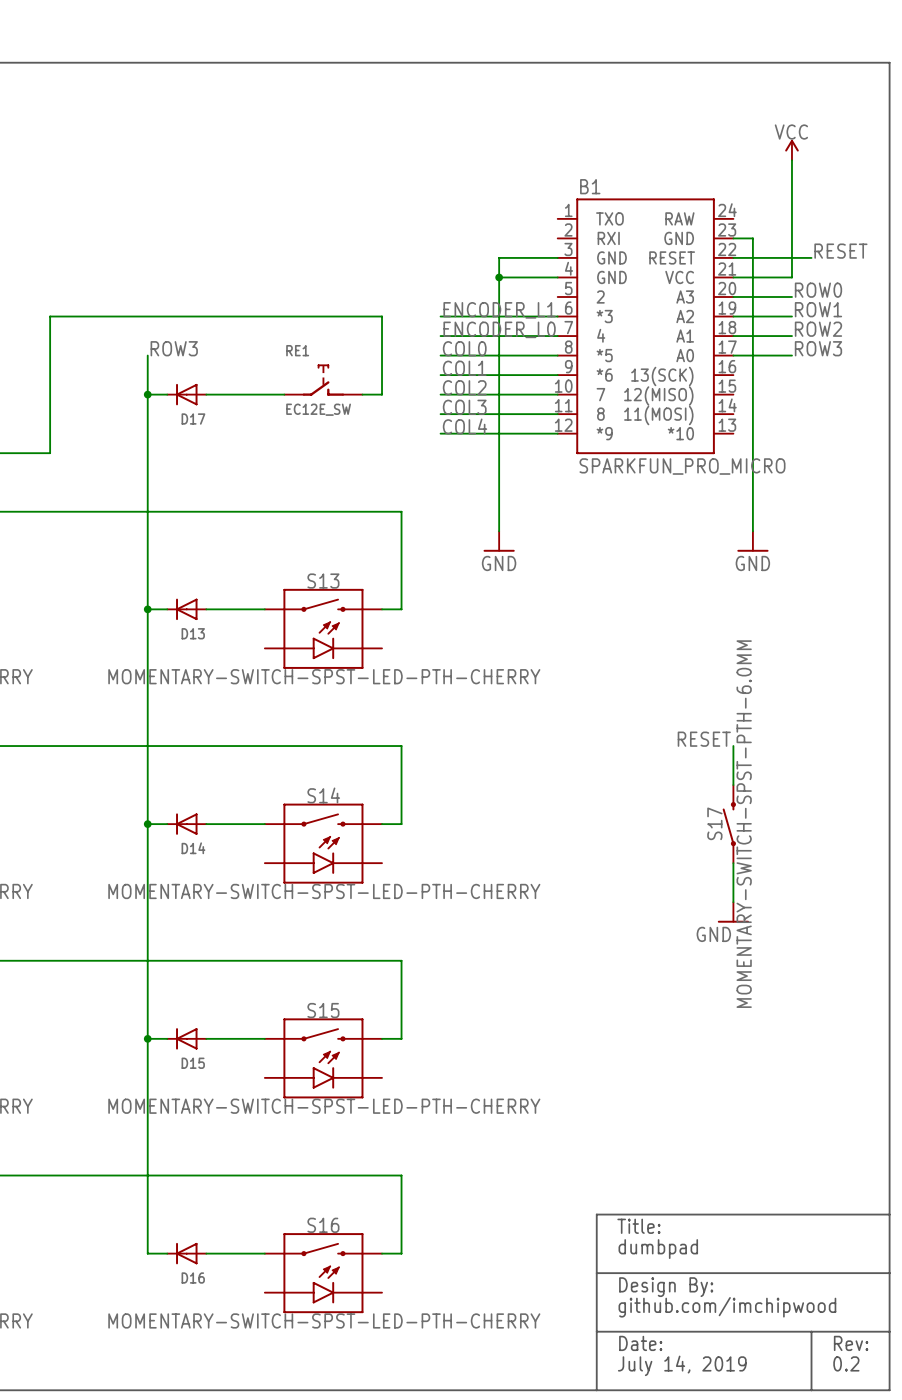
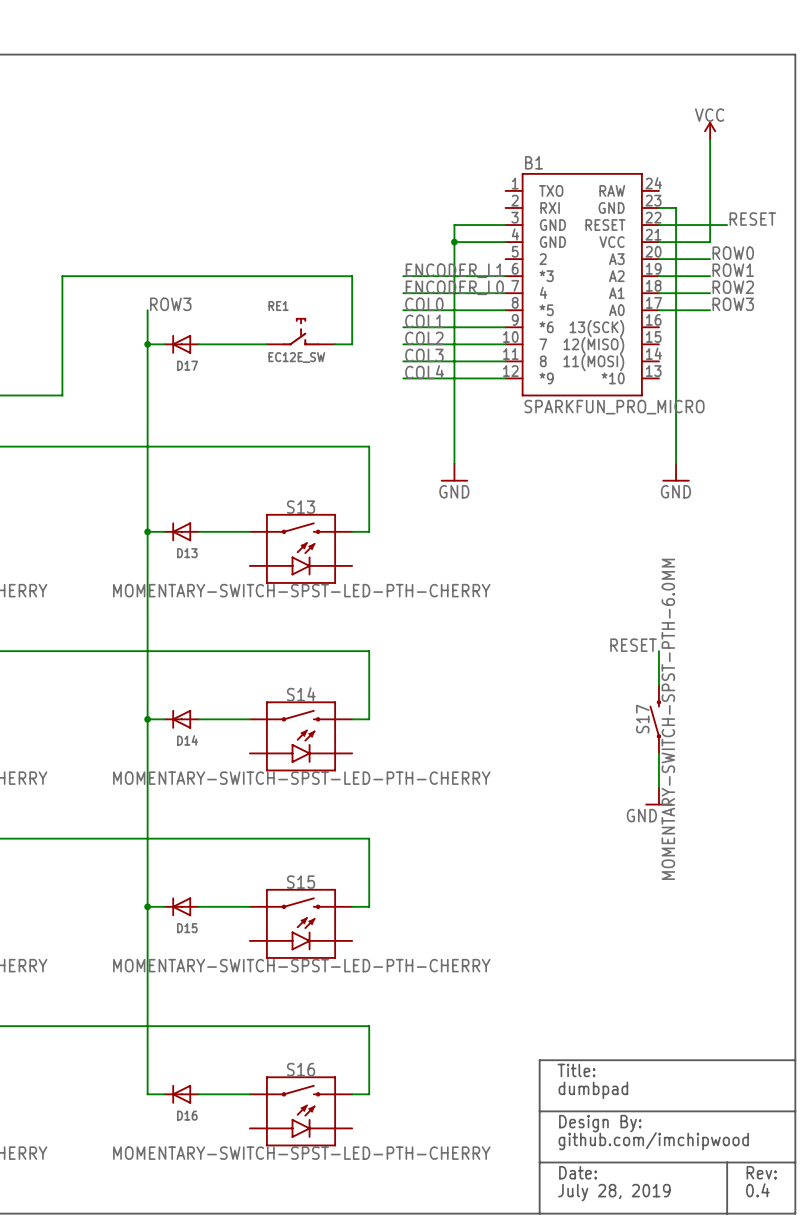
text: 0.2 (846, 1363) -> 0.4 (757, 1190)
text: July 14, 2019 (682, 1365) -> July 28, 2019 (614, 1192)

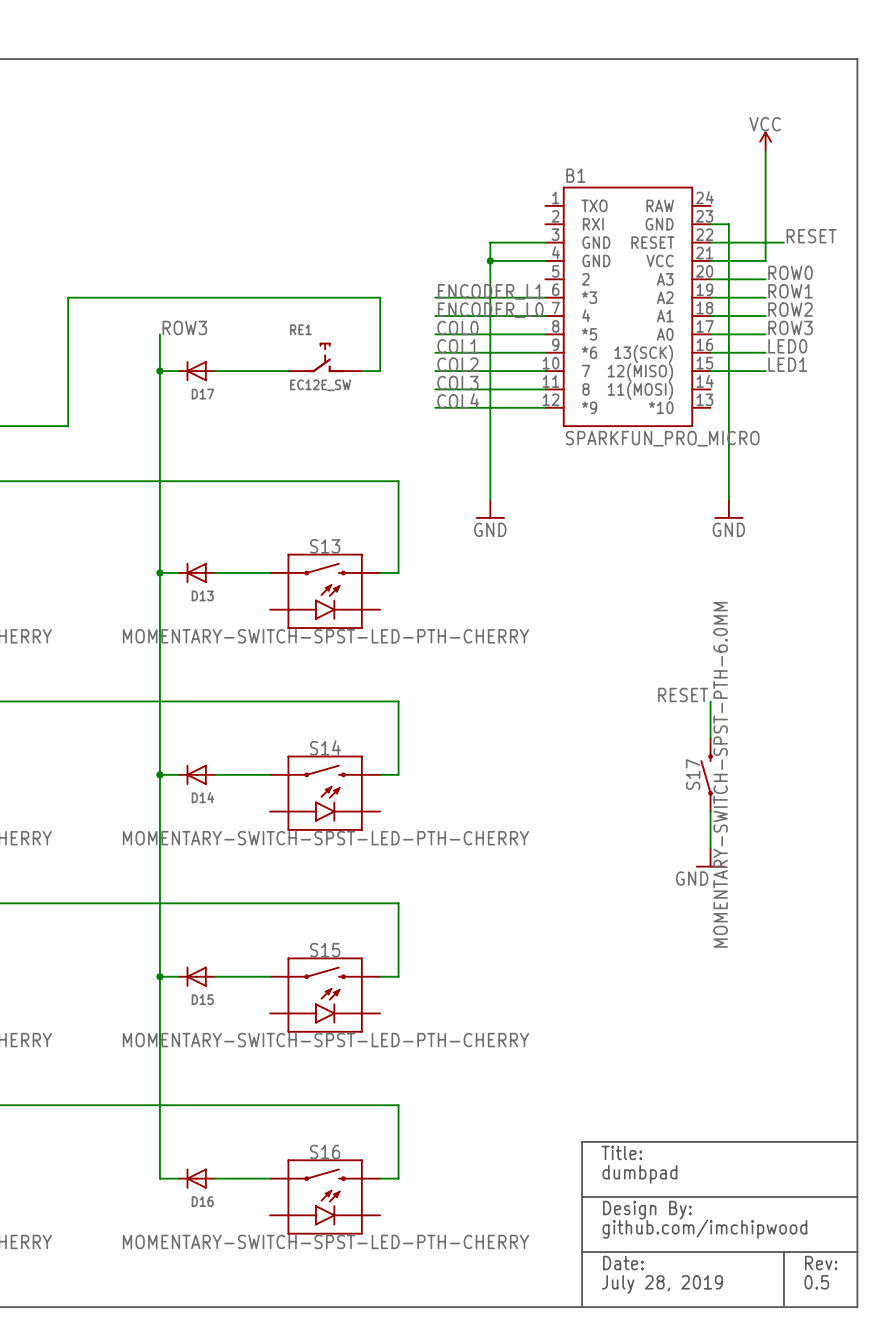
label: none -> LED0 (787, 346)
wire: none -> (710, 352) (765, 352)
label: none -> LED1 (787, 364)
wire: none -> (710, 371) (765, 371)
text: 0.4 (757, 1190) -> 0.5 (816, 1282)

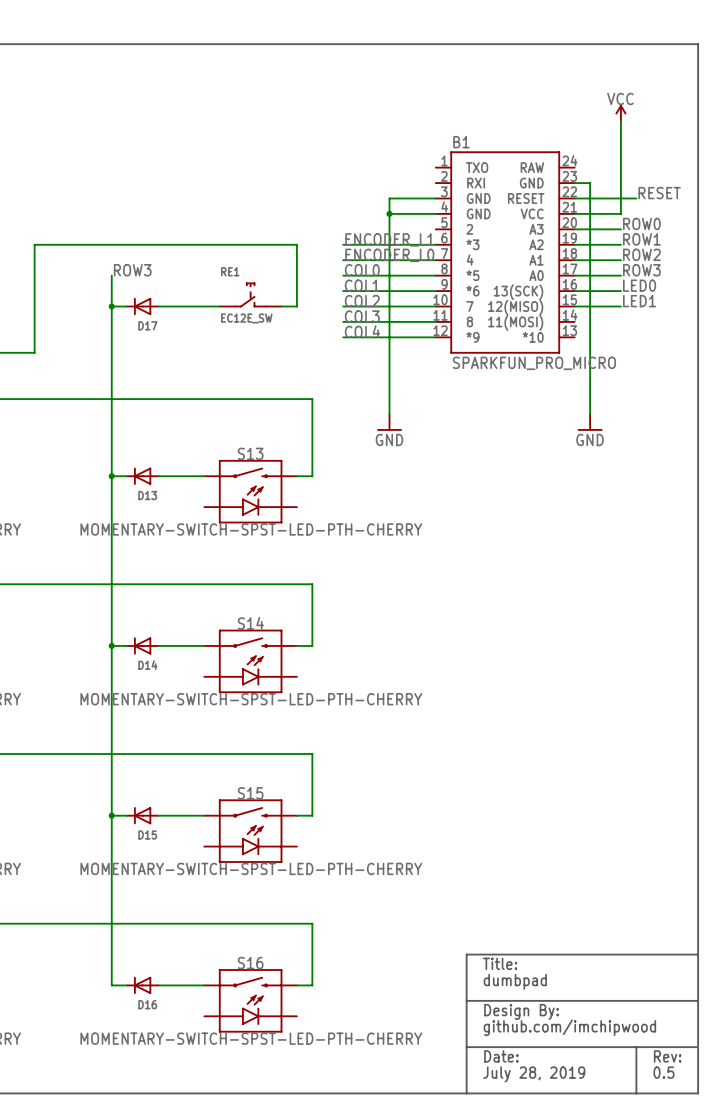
label: RESET (683, 695) -> none
wire: (710, 701) (710, 738) -> none
S17: MOMENTARY-SWITCH-SPST-PTH-6.0MM (706, 774) -> none
wire: (710, 811) (710, 848) -> none
power symbol: GND (710, 857) -> none

